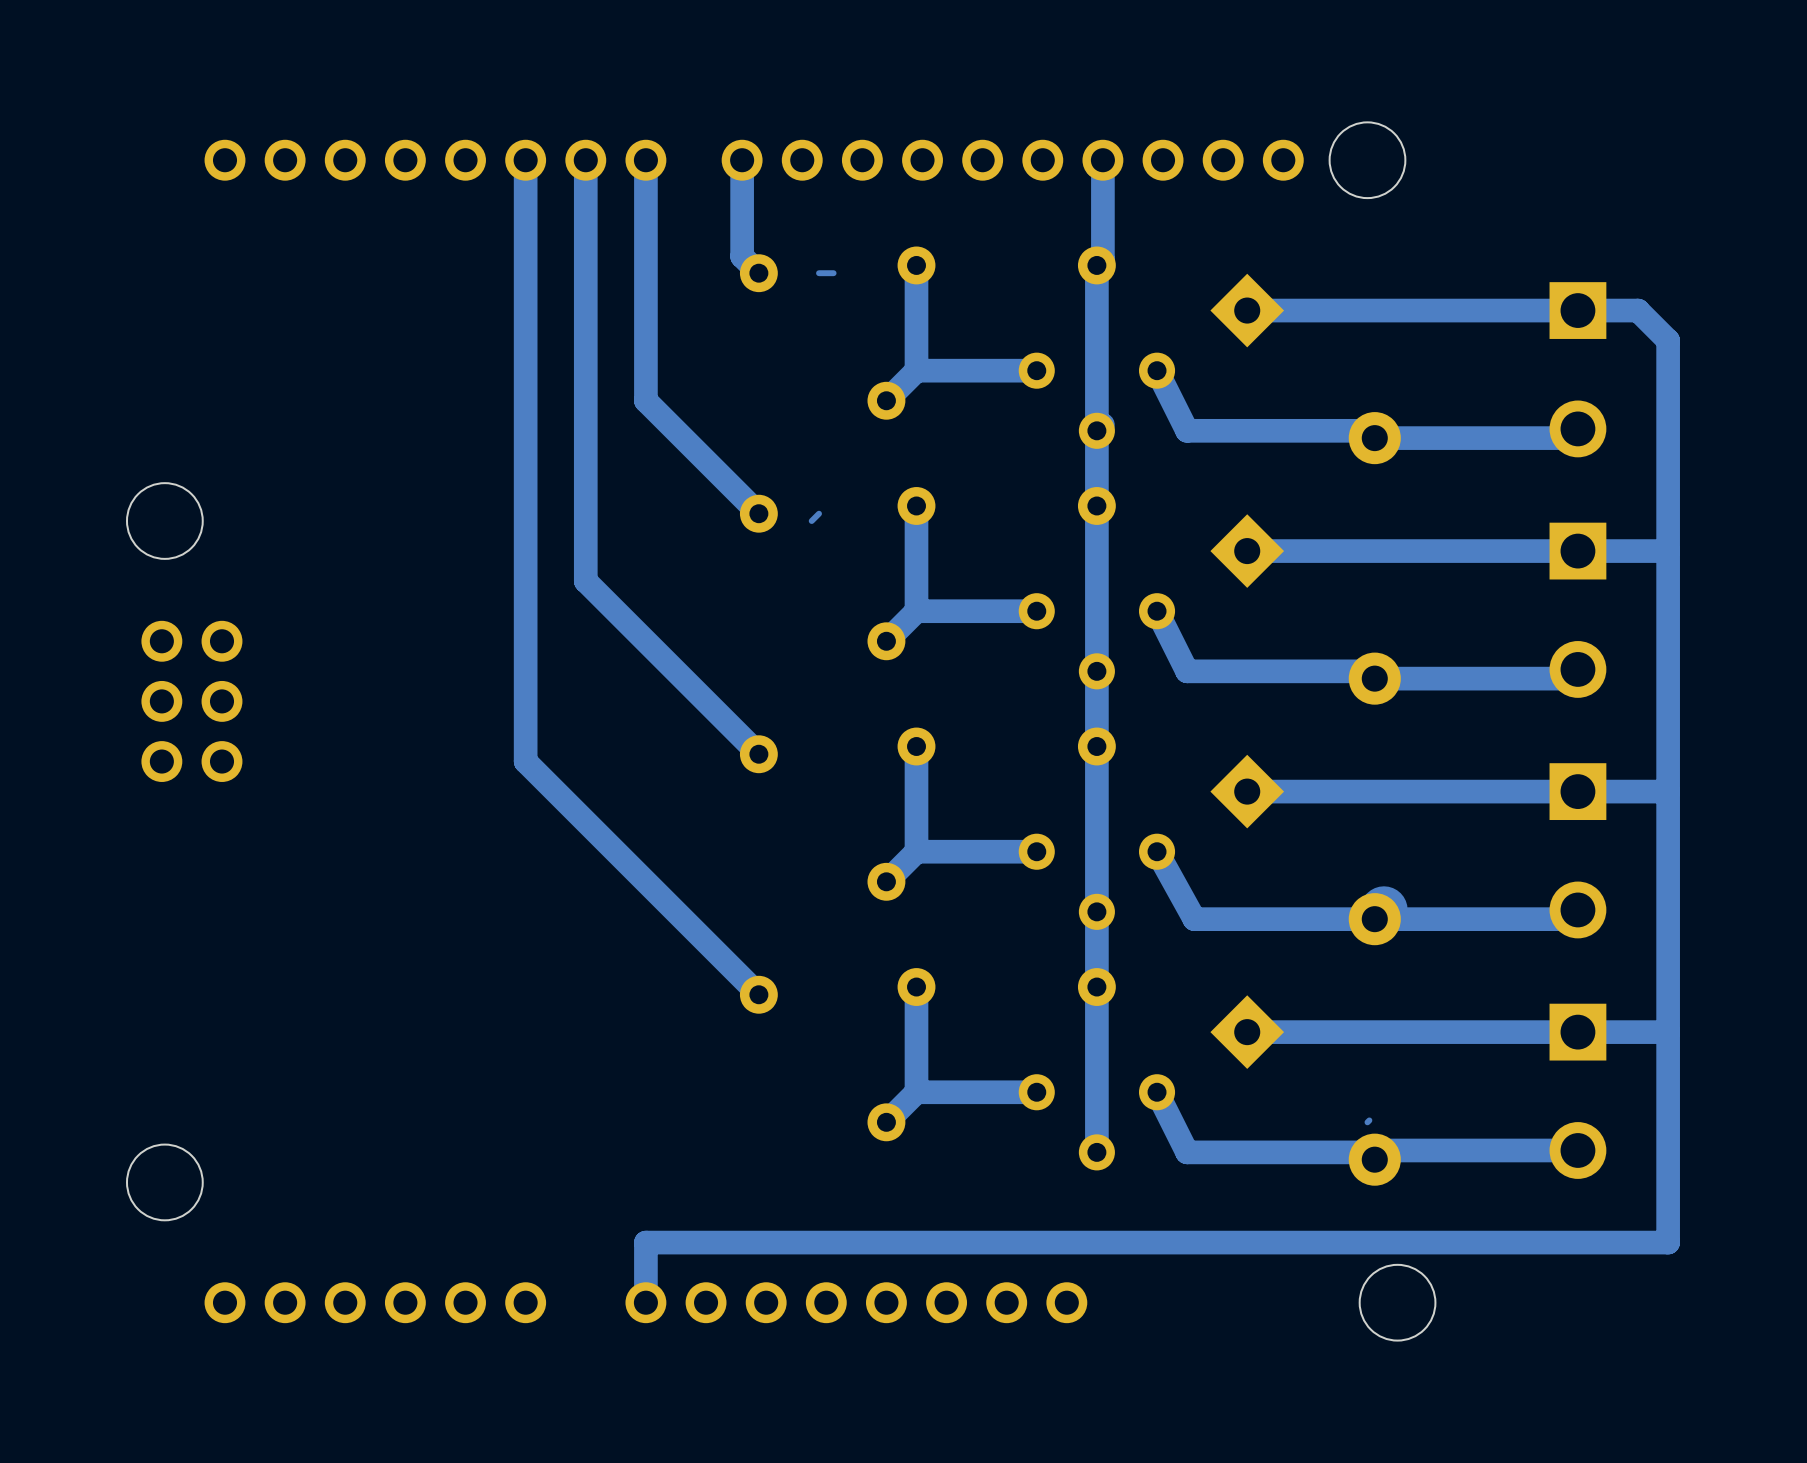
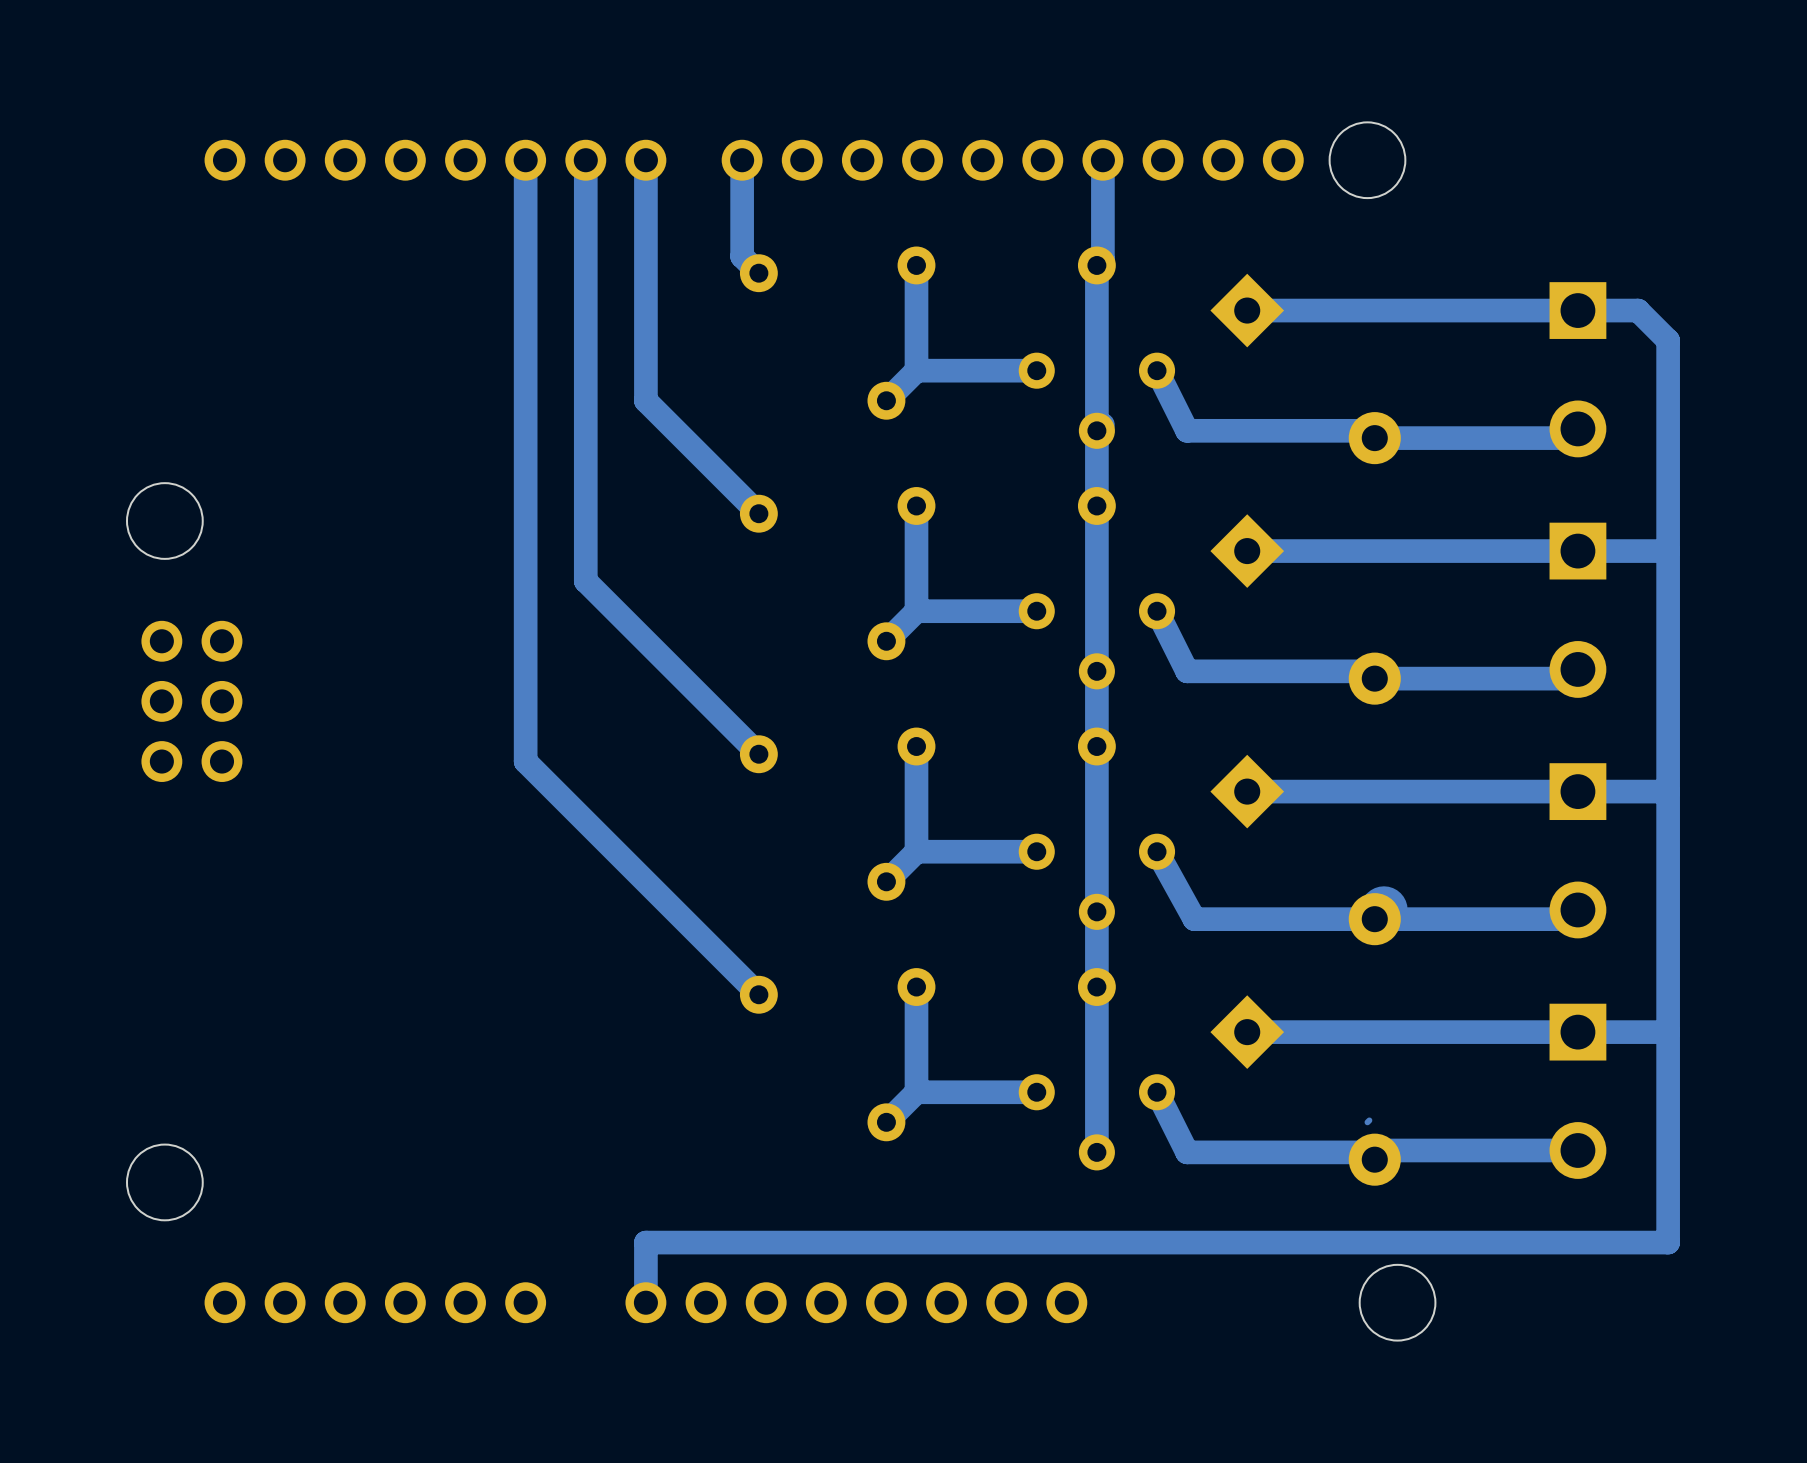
bottom track: (833, 273) (819, 273) -> none
bottom track: (819, 513) (811, 521) -> none

